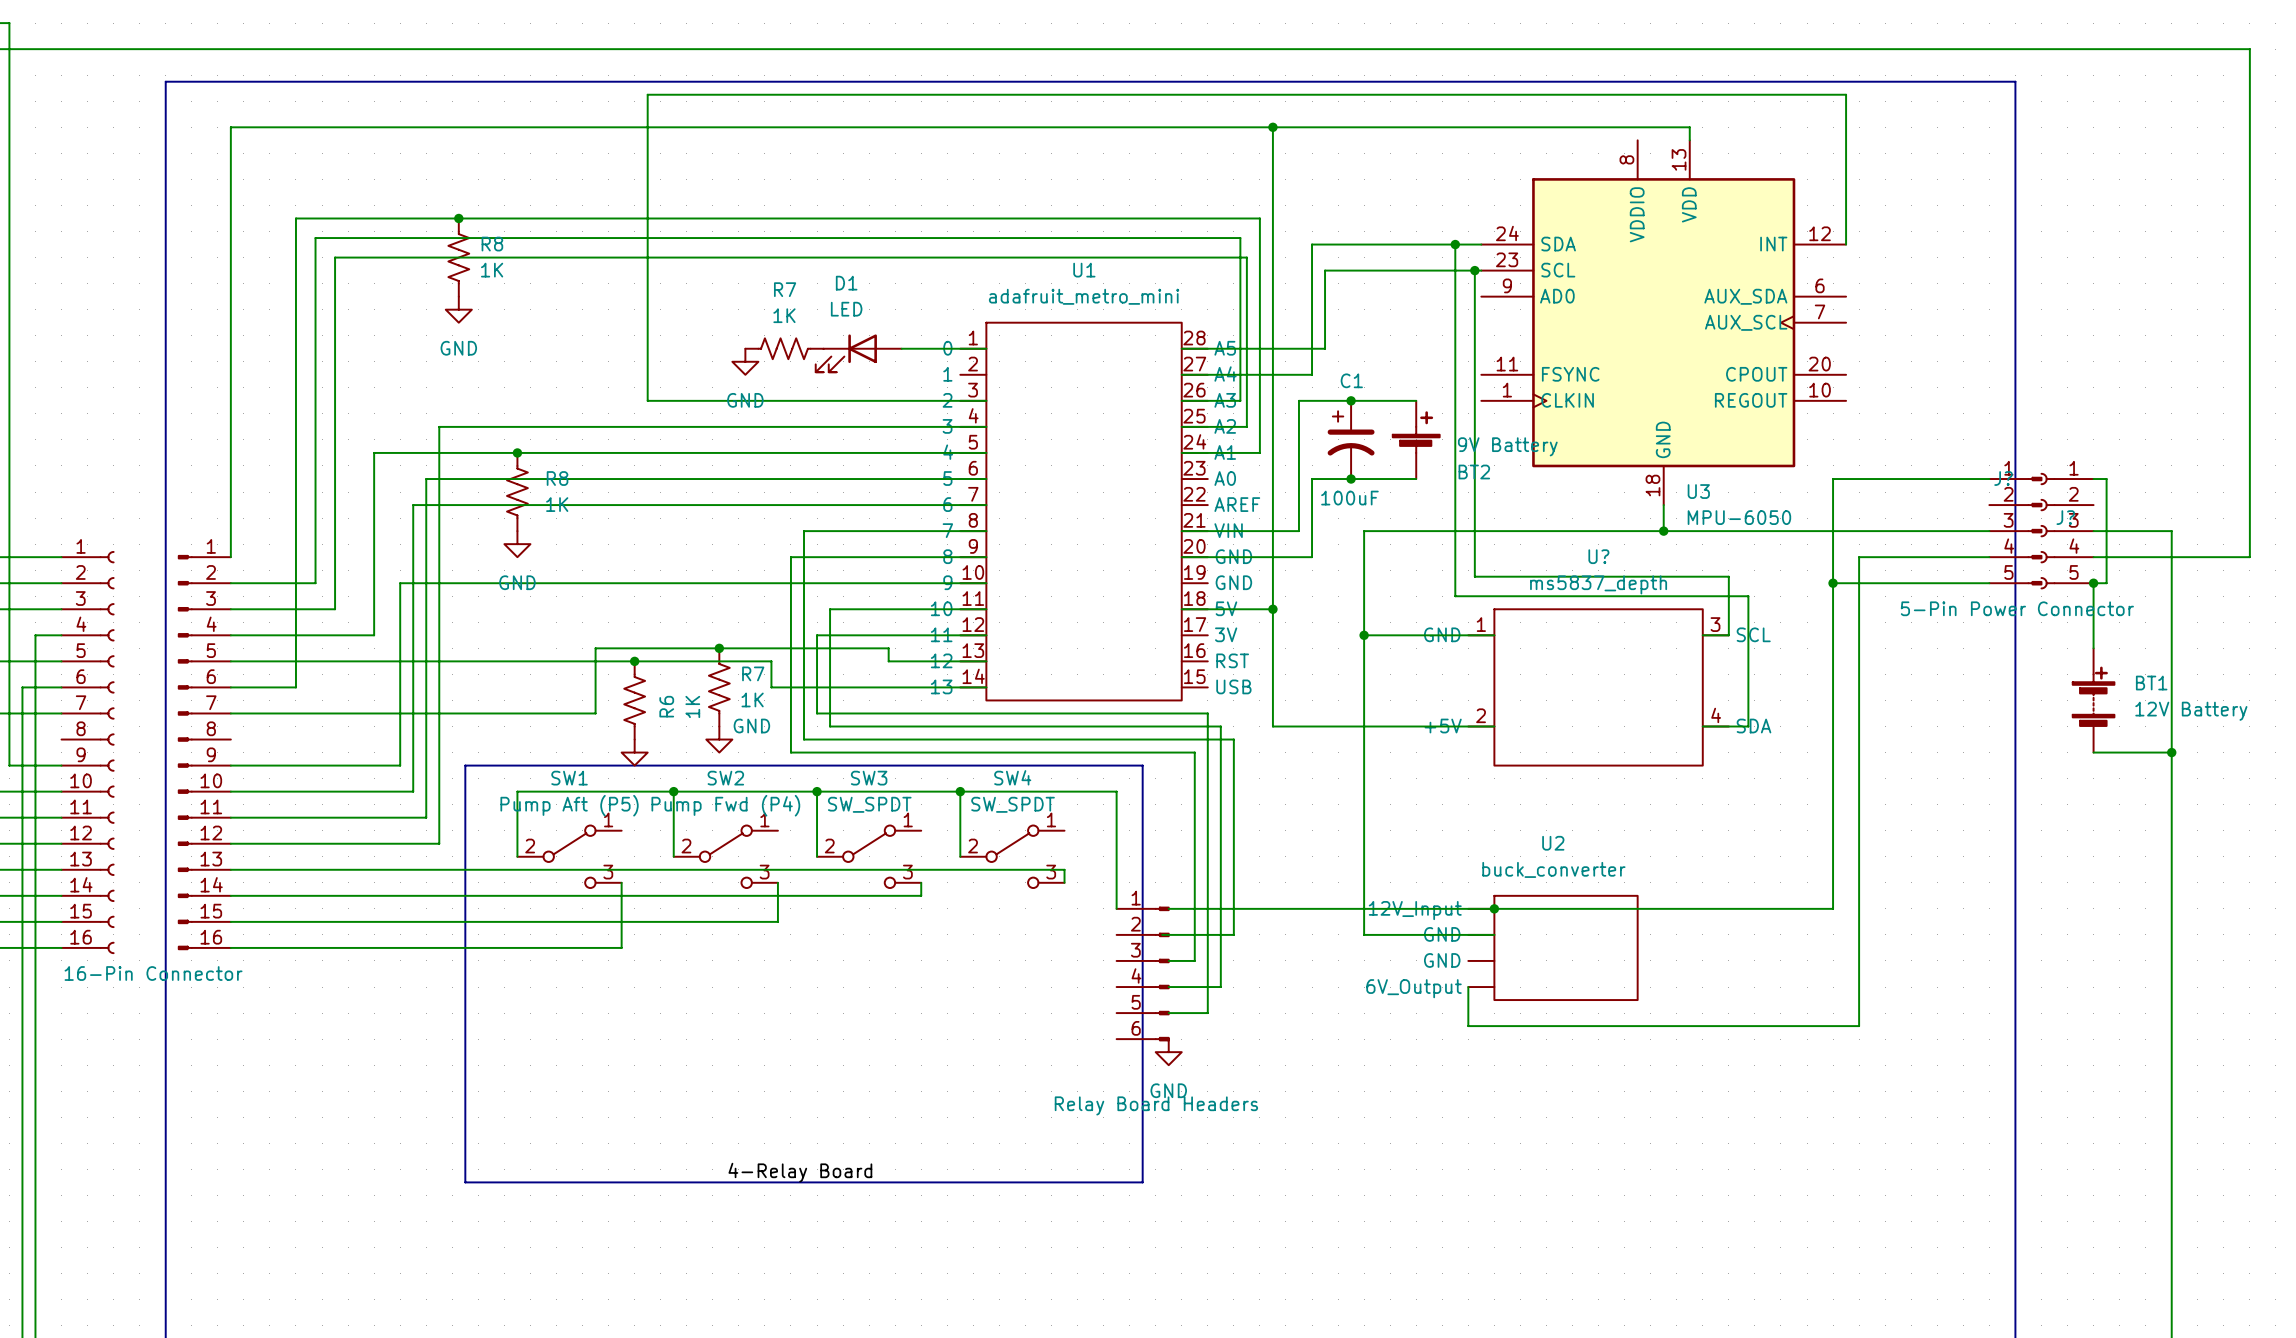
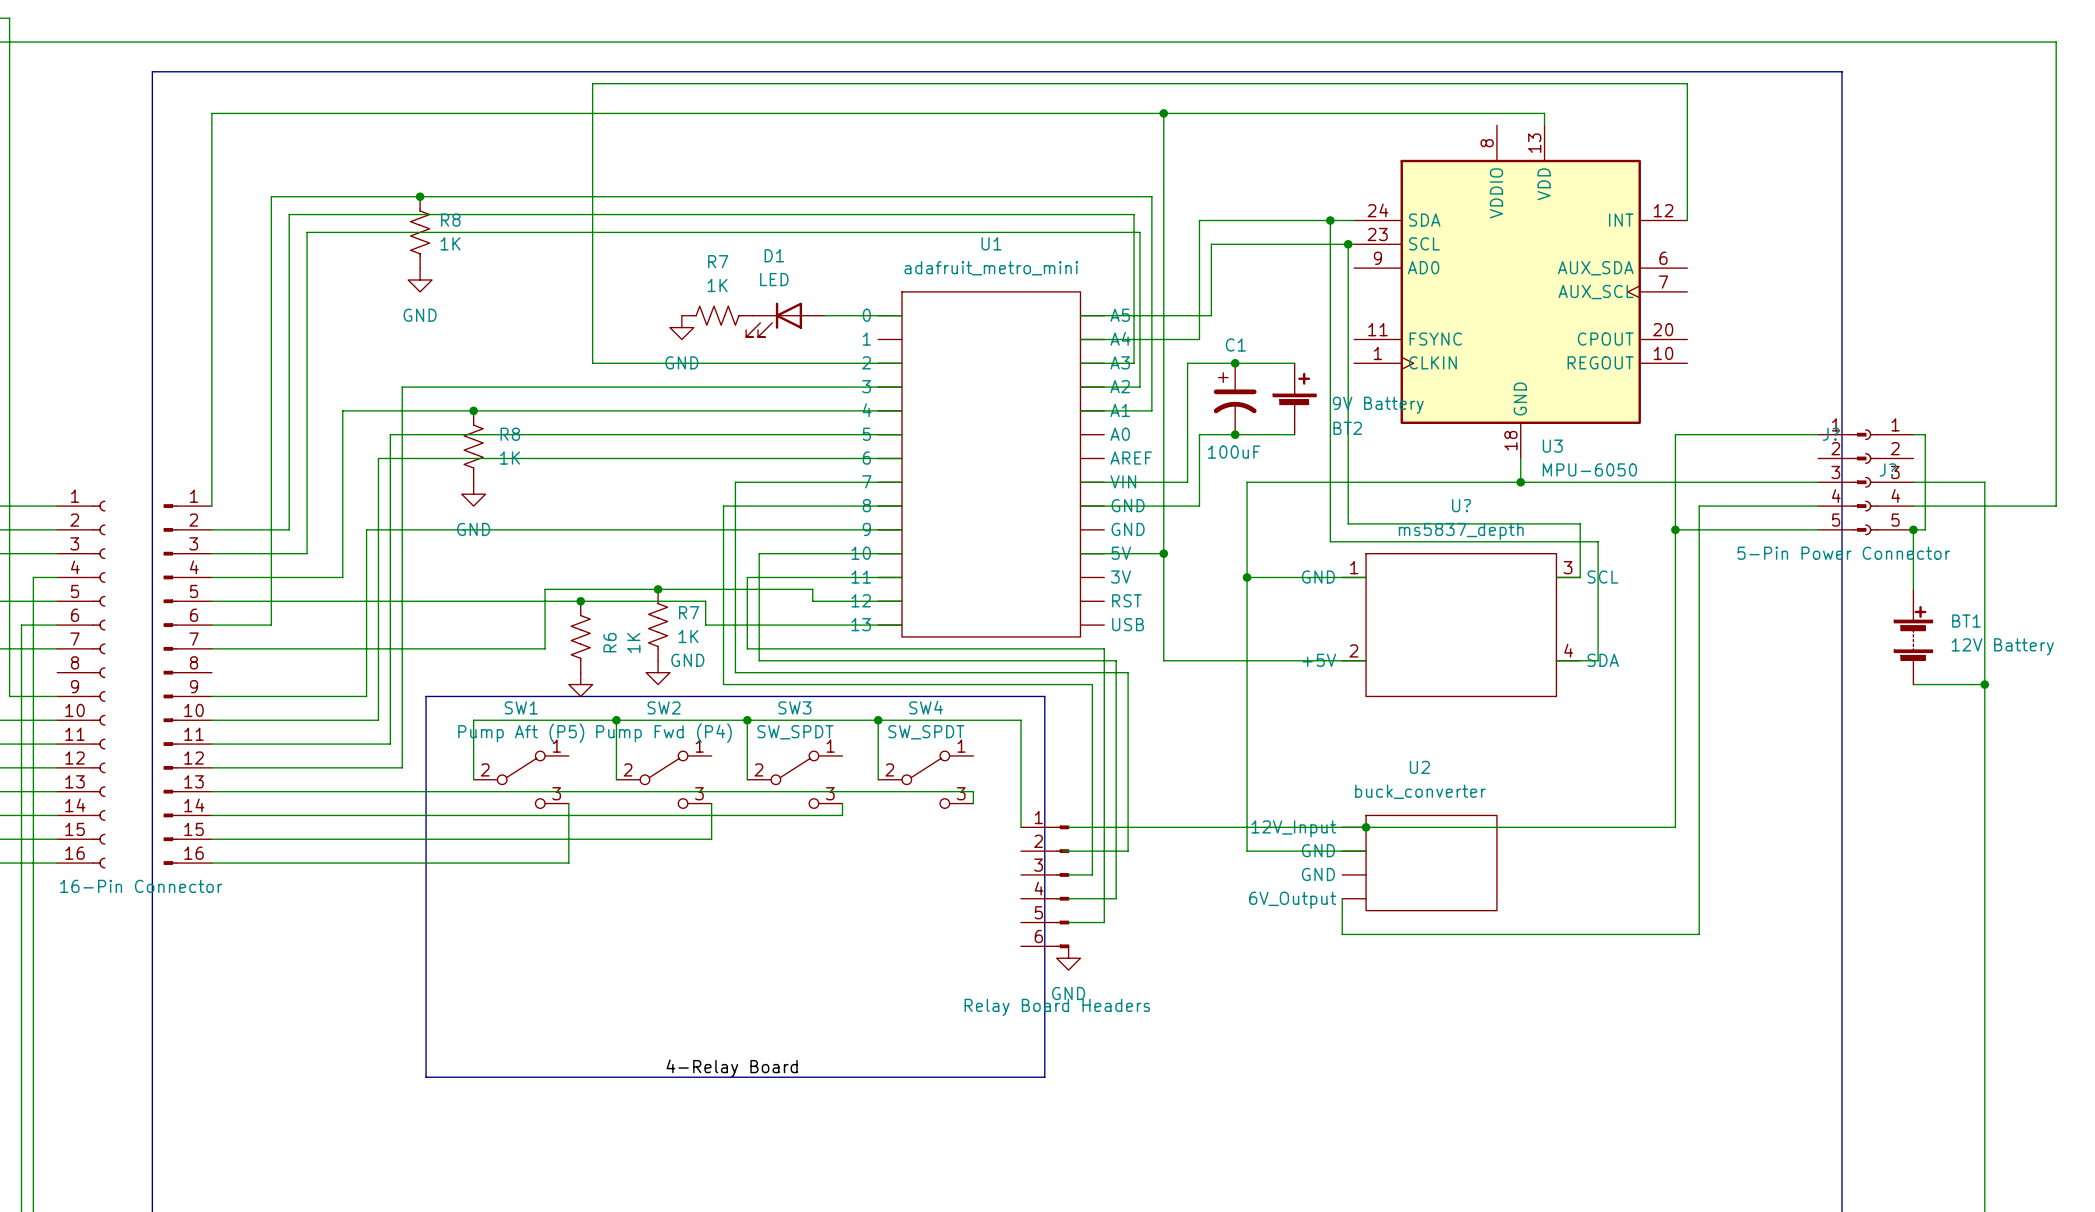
U1 symbol: [960, 322, 1208, 701] -> [878, 291, 1105, 637]

